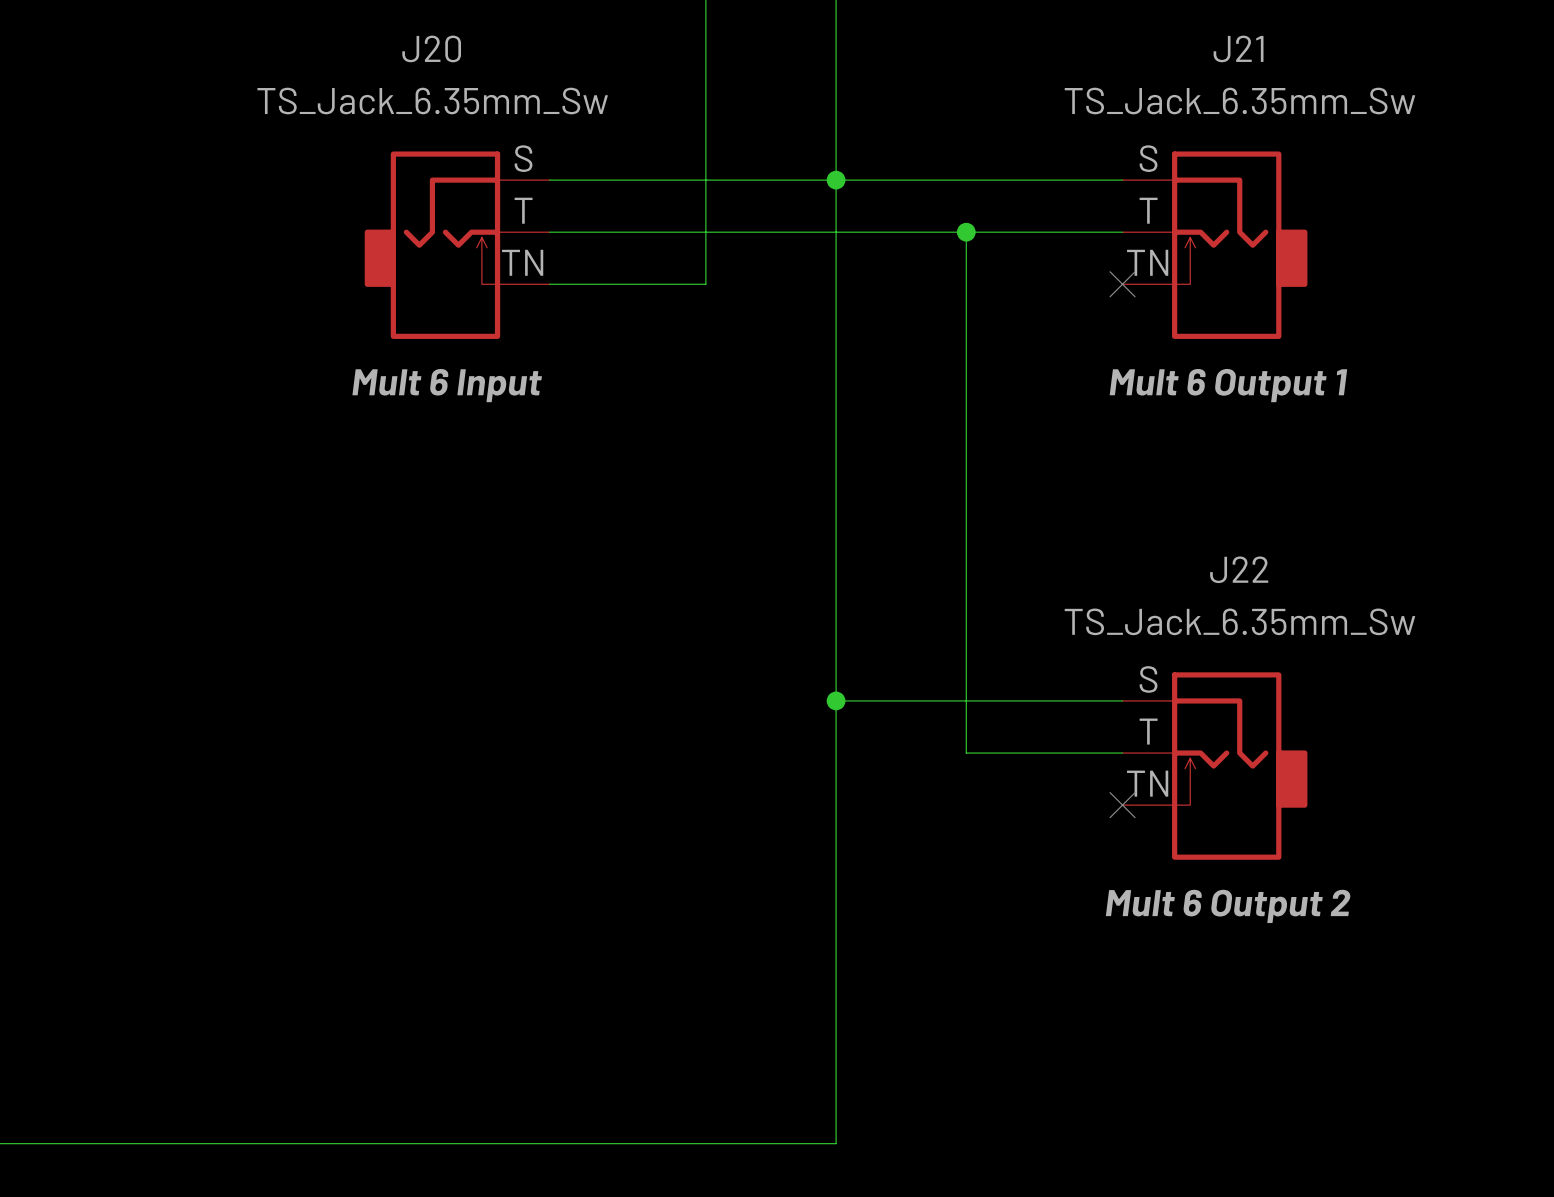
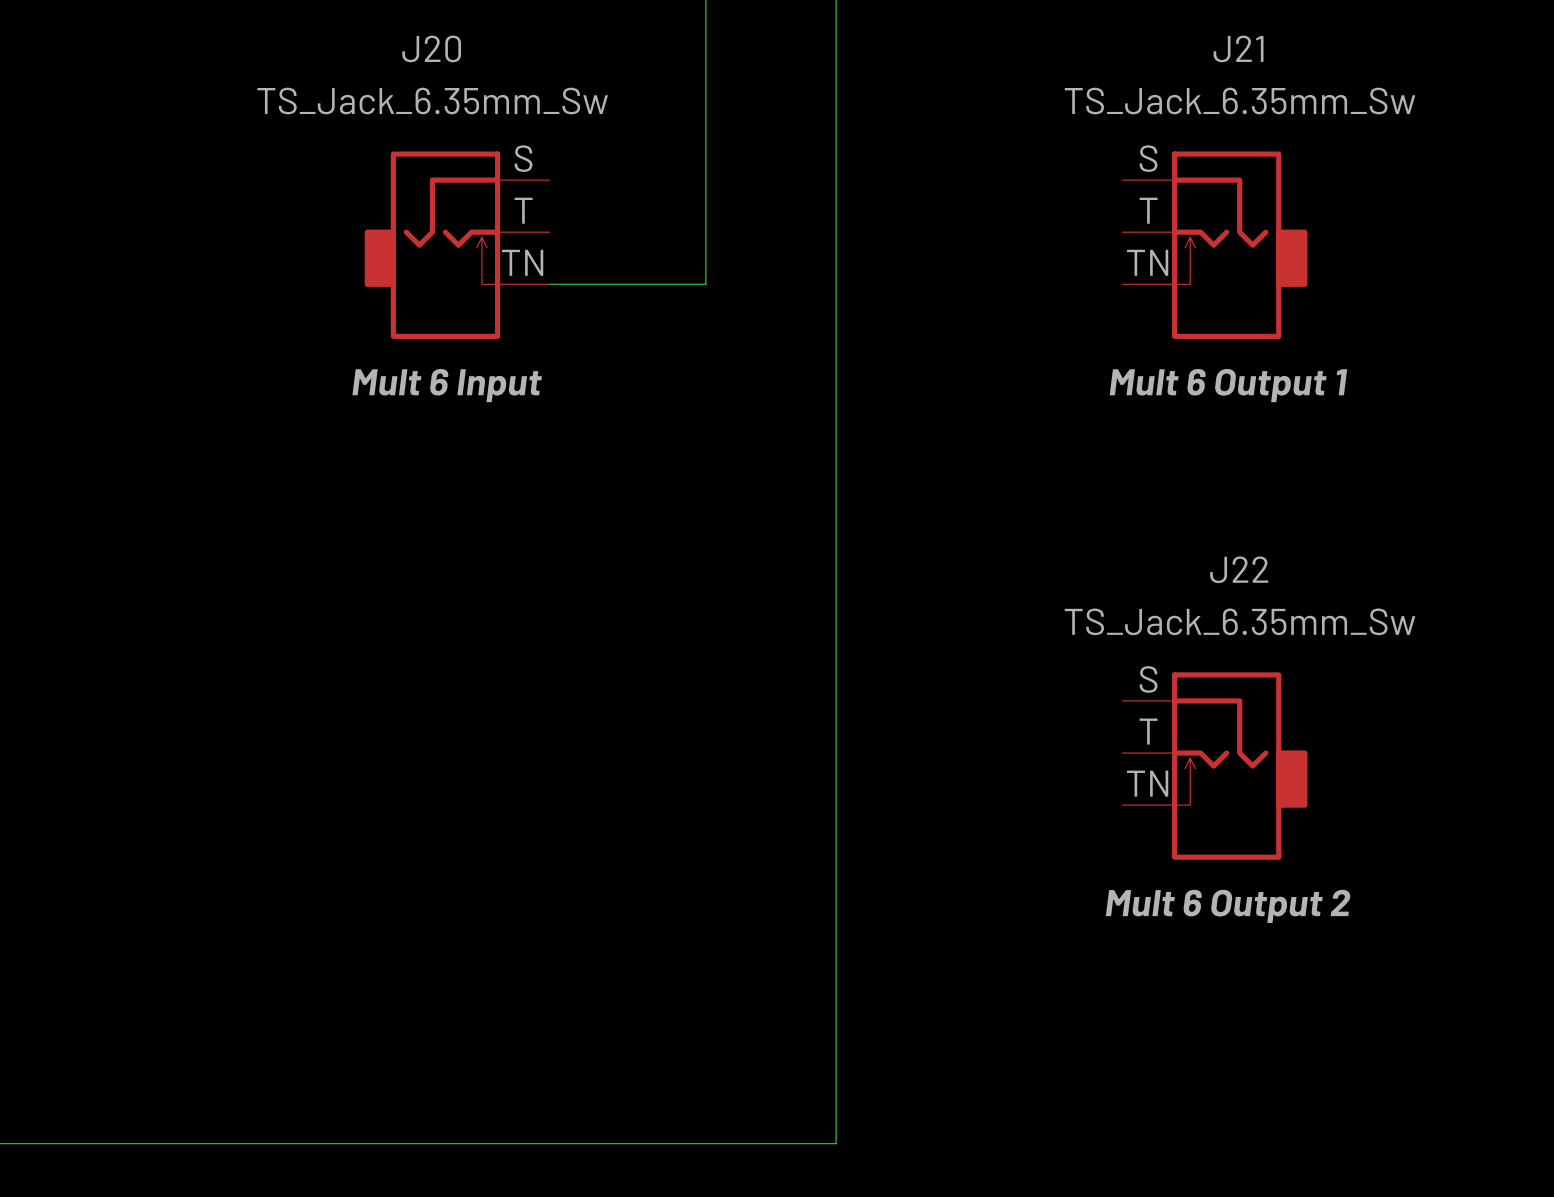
wire: (549, 180) (1122, 180) -> none
junction: (836, 180) -> none
wire: (549, 232) (1122, 232) -> none
wire: (966, 232) (966, 753) (1122, 753) -> none
junction: (966, 232) -> none
no-connect mark: (1122, 284) -> none
wire: (836, 700) (1122, 700) -> none
junction: (836, 700) -> none
no-connect mark: (1122, 805) -> none

